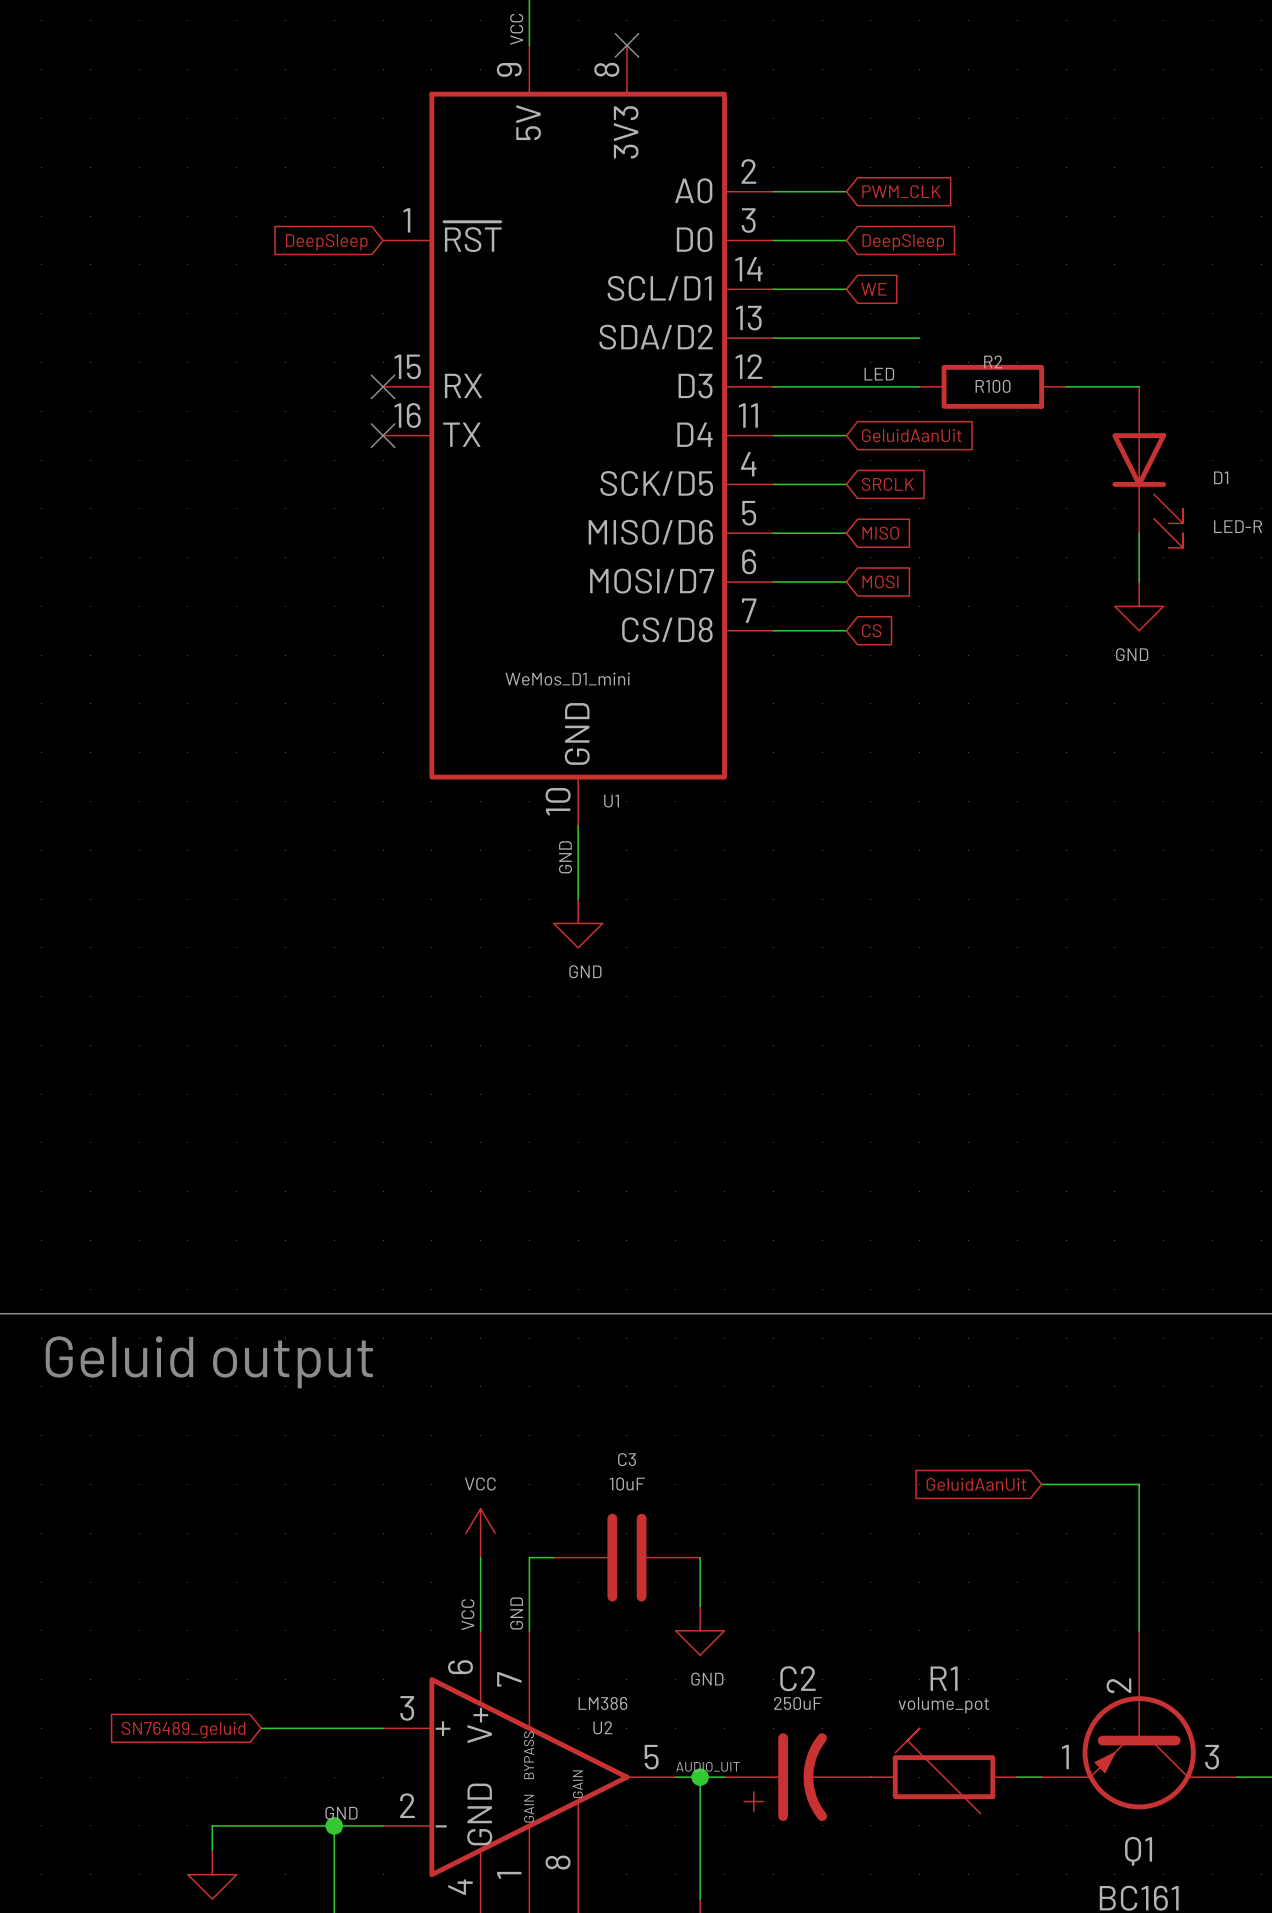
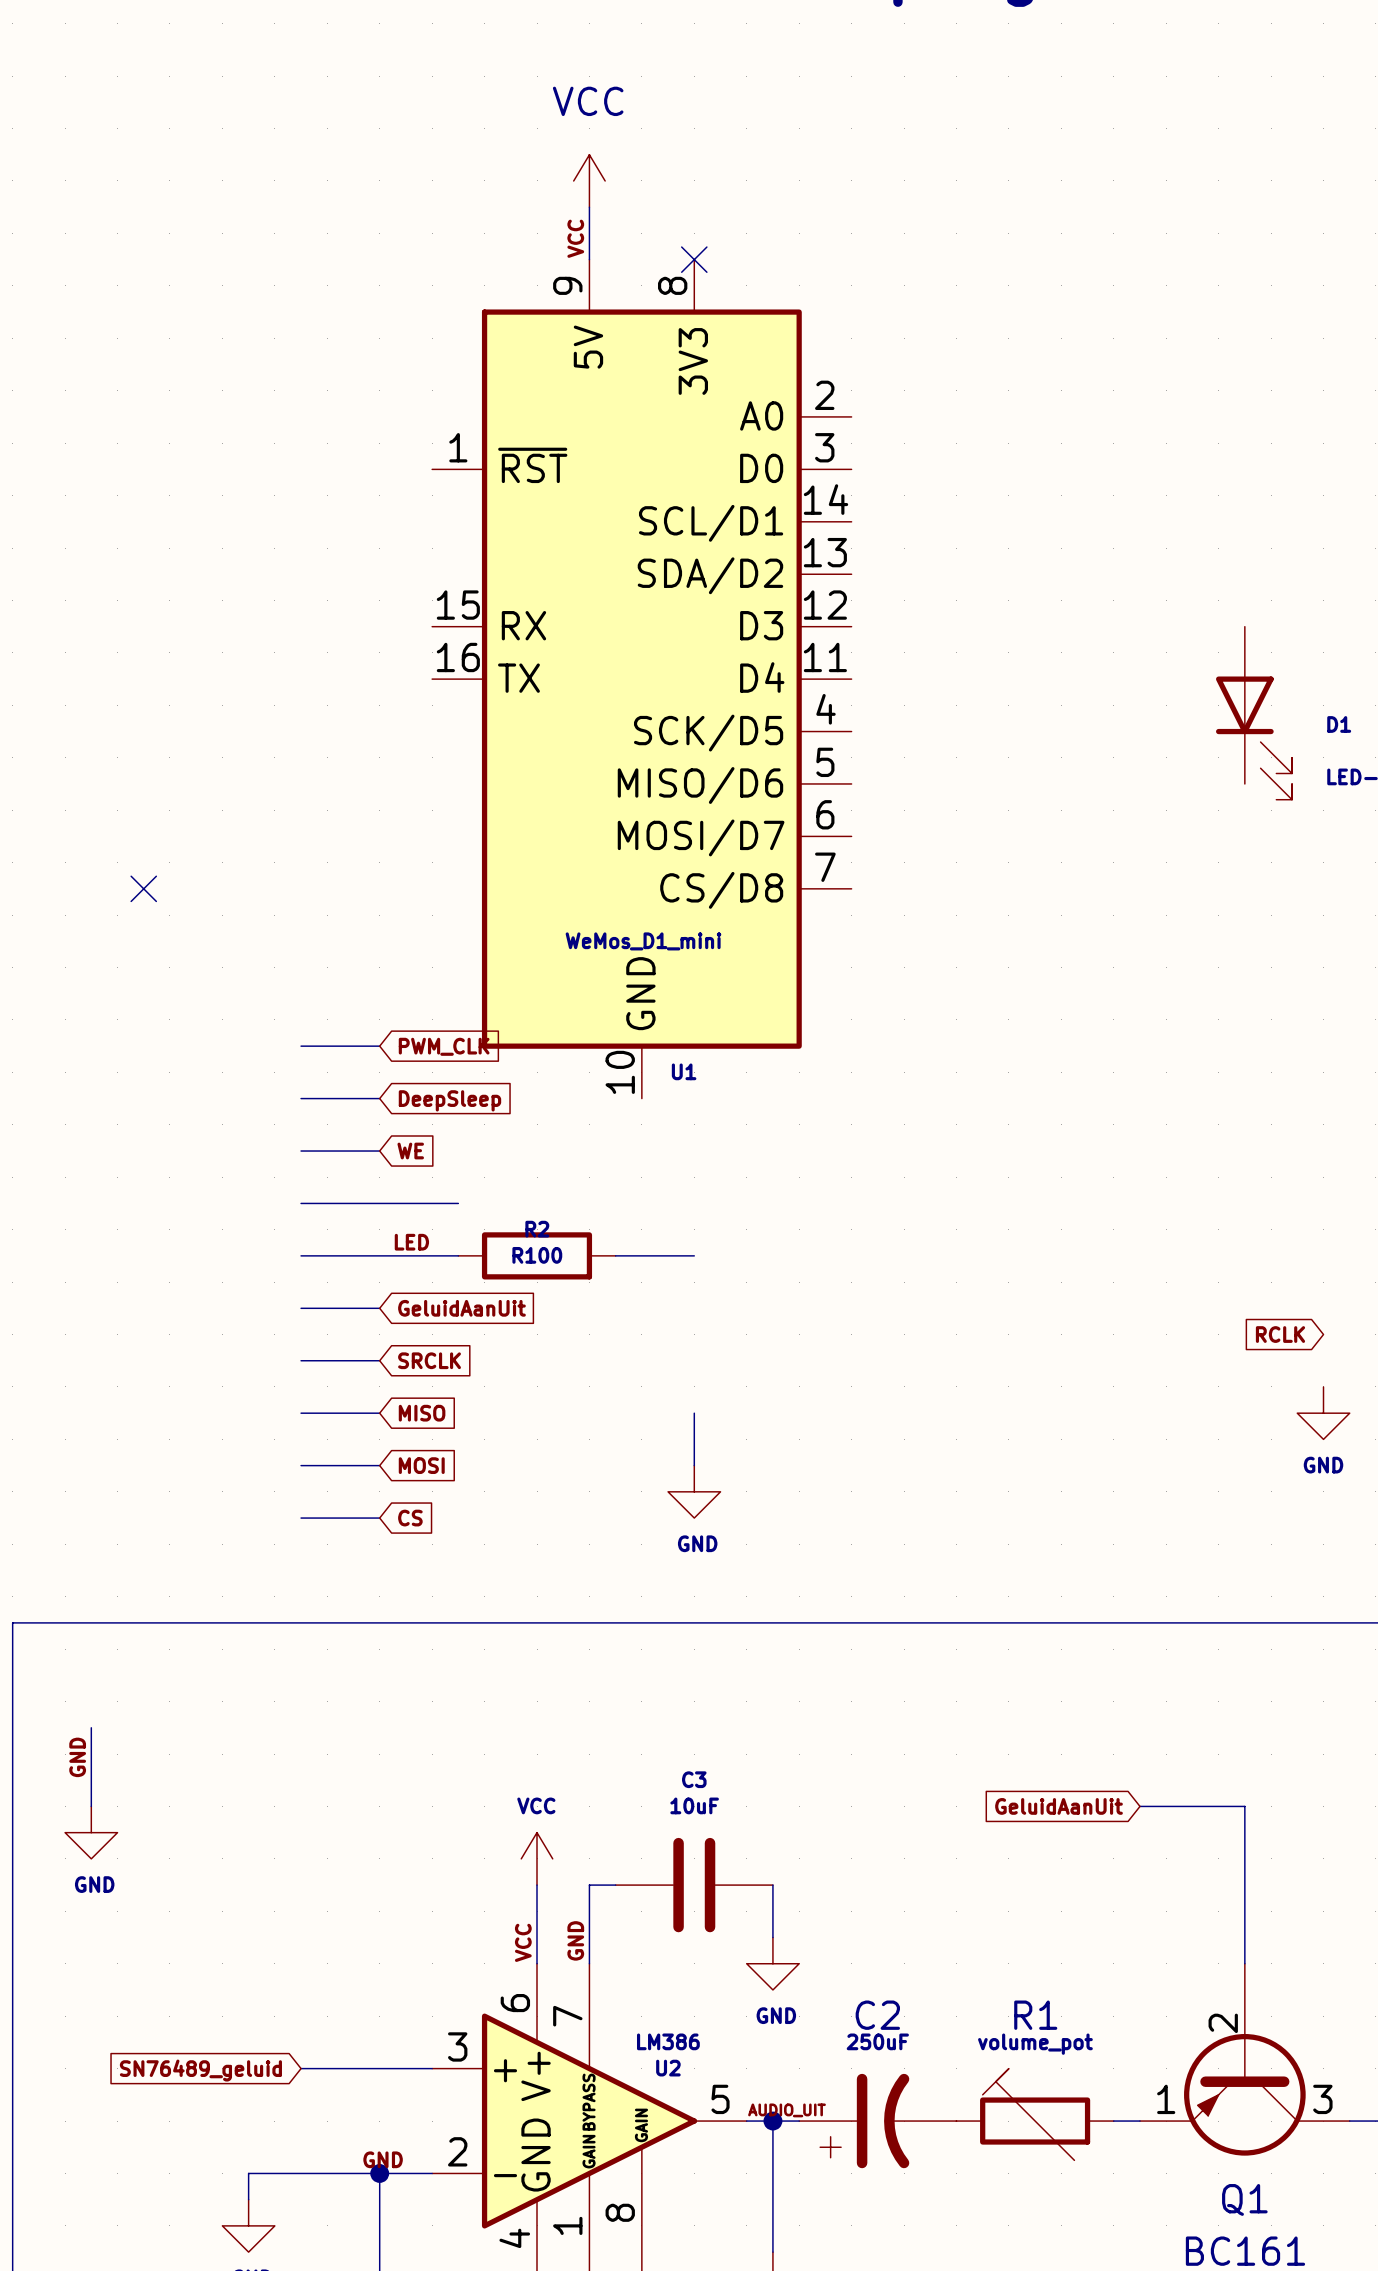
wire: (773, 191) (846, 191) -> none
global label: PWM_CLK (901, 191) -> none
wire: (773, 240) (846, 240) -> none
global label: DeepSleep (326, 242) -> none
global label: DeepSleep (903, 242) -> none
wire: (773, 289) (846, 289) -> none
global label: WE (873, 289) -> none
wire: (773, 338) (919, 338) -> none
label: LED (879, 374) -> none
no-connect mark: (383, 386) -> none
wire: (773, 386) (919, 386) -> none
R2 position: (992, 386) -> (537, 1255)
wire: (1066, 386) (1139, 386) -> none
no-connect mark: (383, 435) -> none
wire: (773, 435) (846, 435) -> none
global label: GeluidAanUit (911, 435) -> none
wire: (773, 484) (846, 484) -> none
global label: SRCLK (887, 484) -> none
wire: (773, 533) (846, 533) -> none
global label: MISO (880, 533) -> none
wire: (1139, 533) (1139, 581) -> none
wire: (773, 581) (846, 581) -> none
global label: MOSI (880, 581) -> none
power symbol: GND (1139, 606) -> none
no-connect mark: none -> (143, 888)
wire: (773, 630) (846, 630) -> (615, 1255) (694, 1255)
global label: CS (871, 630) -> none
wire: none -> (301, 1046) (379, 1046)
global label: none -> PWM_CLK (444, 1046)
wire: none -> (301, 1098) (379, 1098)
wire: (578, 825) (578, 899) -> none
global label: none -> DeepSleep (449, 1100)
label: GND (565, 857) -> none
wire: none -> (301, 1151) (379, 1151)
global label: none -> WE (410, 1151)
wire: none -> (301, 1203) (458, 1203)
power symbol position: GND (578, 923) -> GND (694, 1491)
label: none -> LED (411, 1242)
wire: none -> (301, 1255) (458, 1255)
wire: none -> (301, 1308) (379, 1308)
global label: none -> GeluidAanUit (461, 1308)
global label: none -> RCLK (1280, 1334)
wire: none -> (301, 1360) (379, 1360)
global label: none -> SRCLK (429, 1360)
wire: none -> (301, 1413) (379, 1413)
global label: none -> MISO (422, 1413)
wire: none -> (694, 1413) (694, 1465)
power symbol: none -> GND (1323, 1413)
wire: none -> (301, 1465) (379, 1465)
global label: none -> MOSI (421, 1465)
wire: none -> (301, 1518) (379, 1518)
global label: none -> CS (410, 1518)
text: Geluid output (209, 1362) -> none
wire: none -> (91, 1727) (91, 1806)
label: none -> GND (77, 1757)
power symbol: none -> GND (91, 1832)

